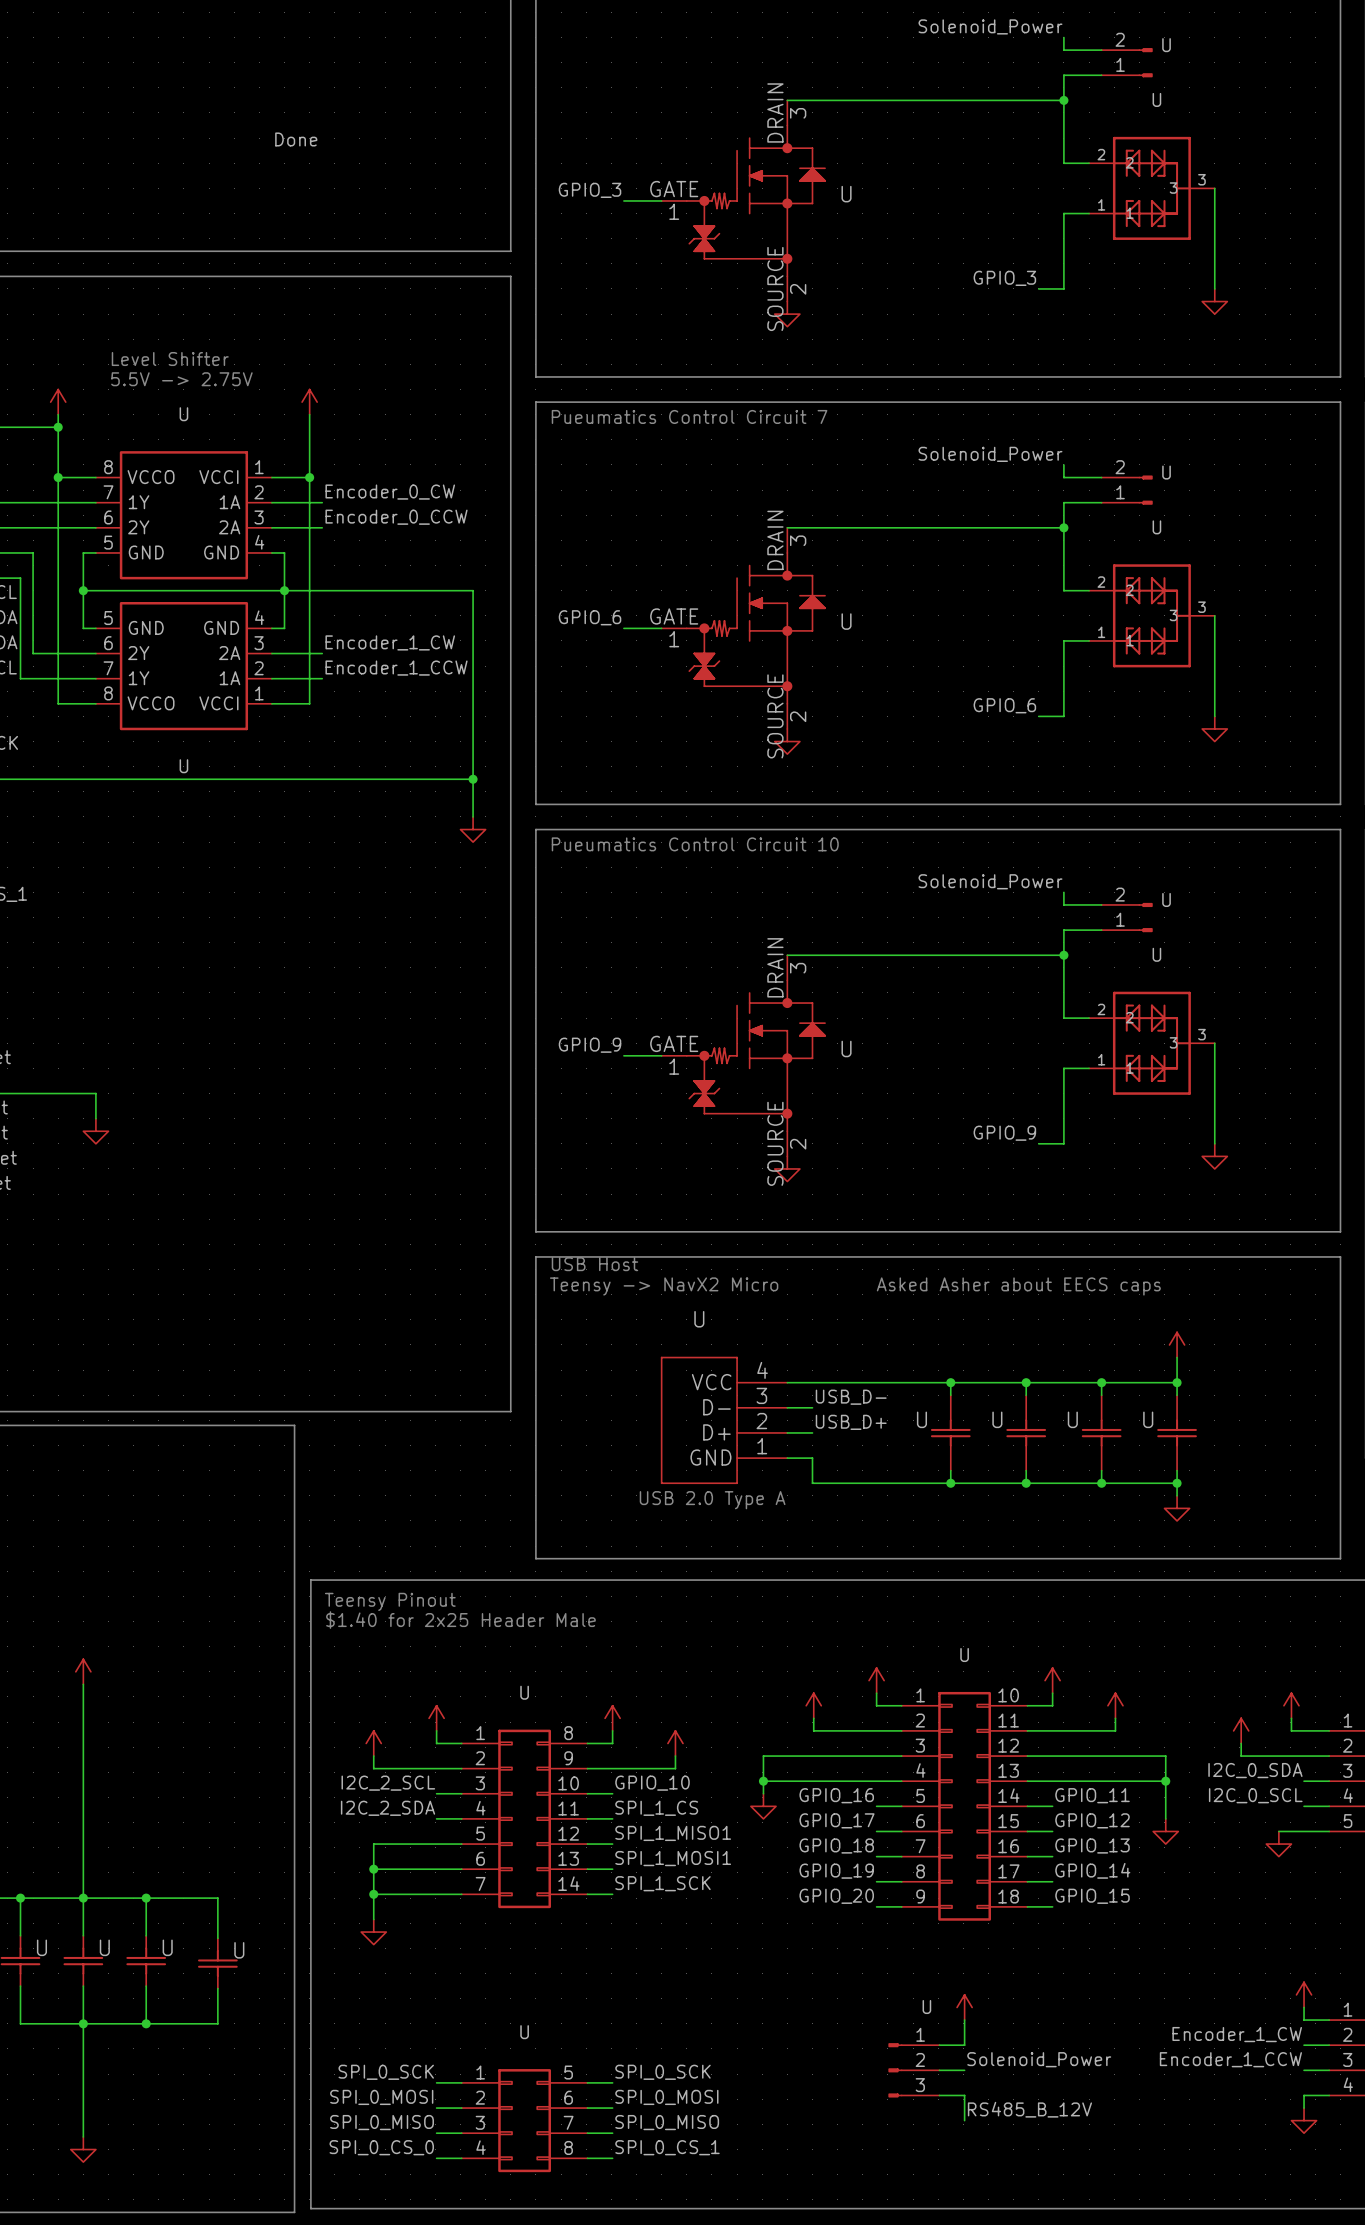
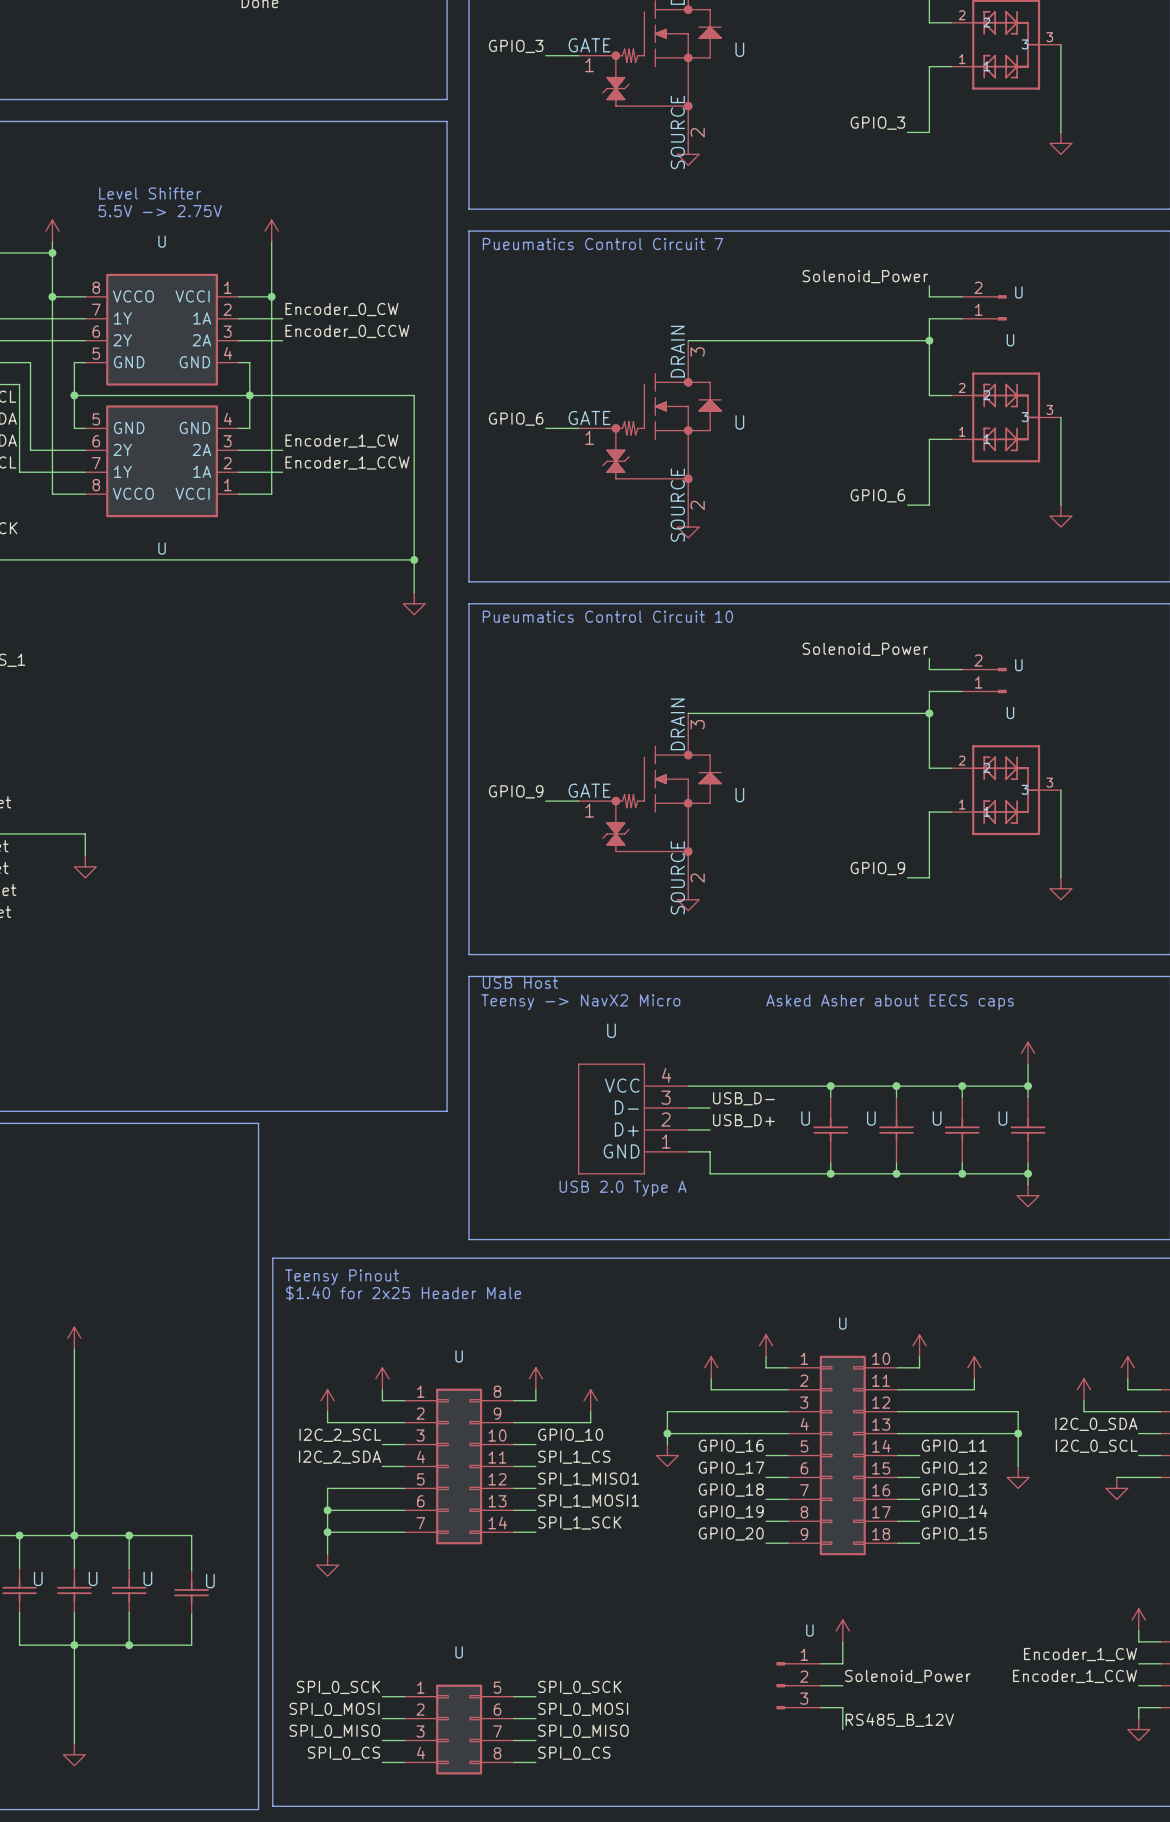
label: SPI_0_CS_0 (381, 2147) -> SPI_0_CS (343, 1753)
label: SPI_0_CS_1 (667, 2147) -> SPI_0_CS (574, 1753)

